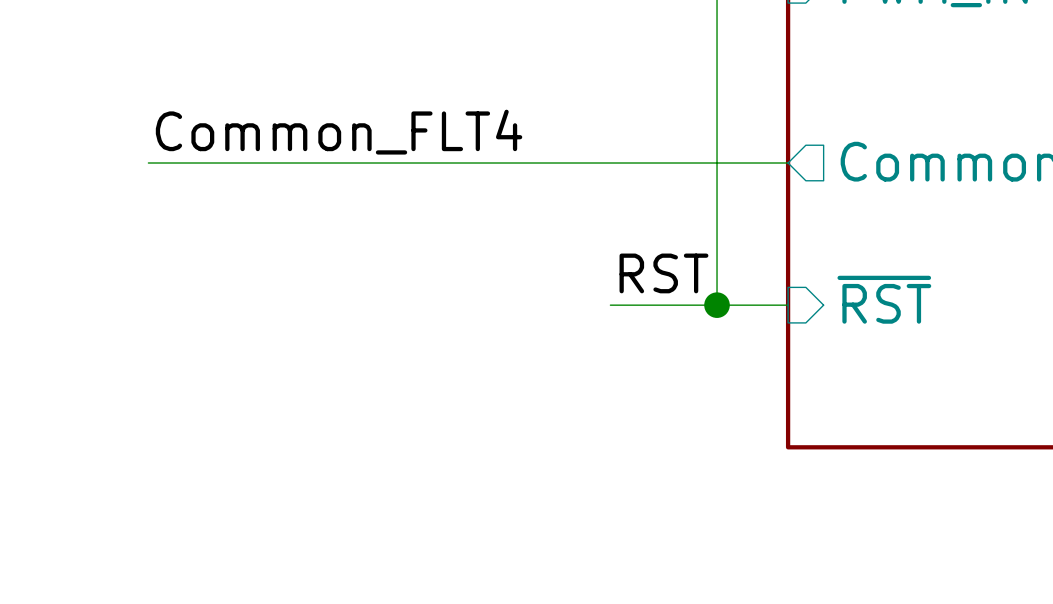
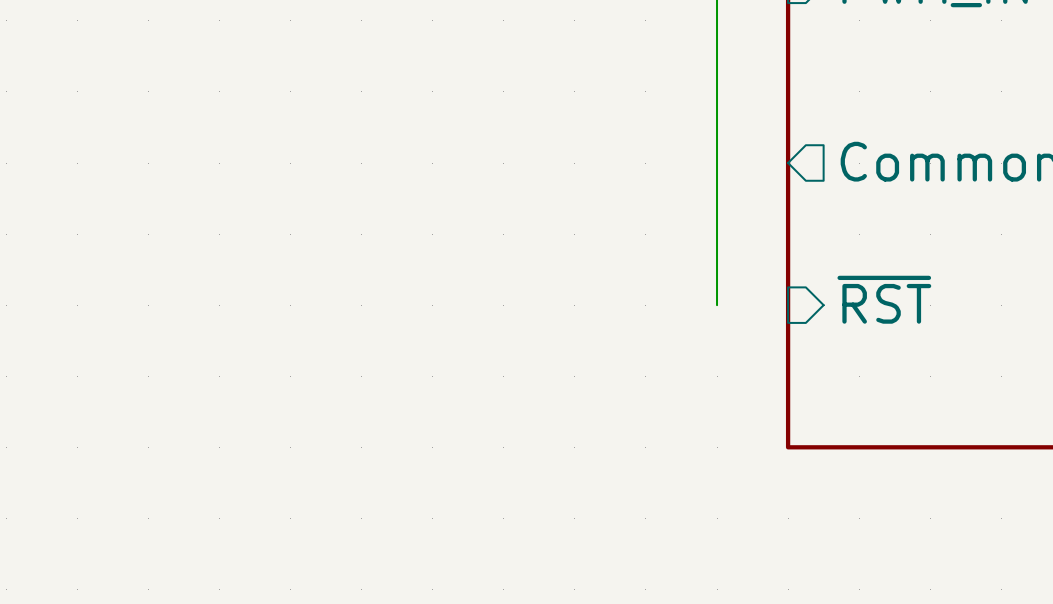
label: Common_FLT4 (339, 132) -> none
wire: (148, 163) (788, 163) -> none
label: RST (663, 273) -> none
wire: (610, 305) (788, 305) -> none
junction: (717, 305) -> none

